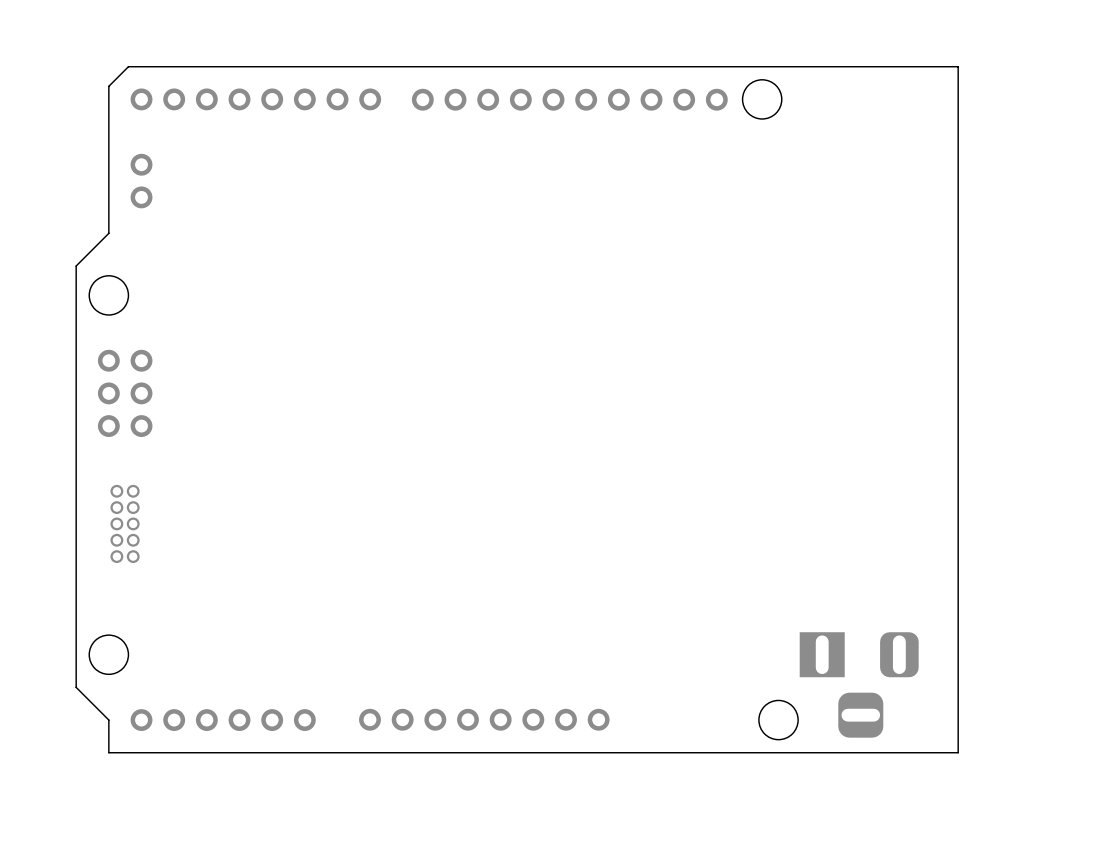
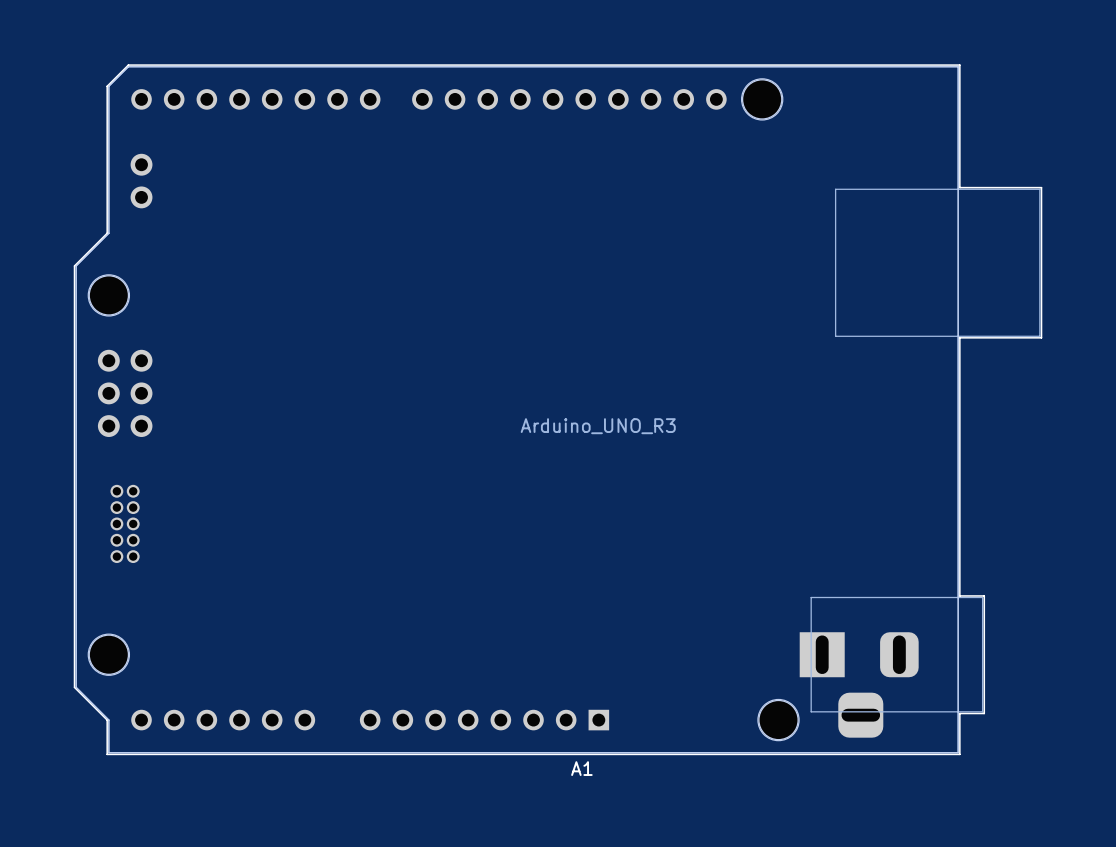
part: (255, 99) -> none
part: (569, 99) -> none
A1: none -> Arduino_UNO_R3 (558, 409)
part: (484, 719) -> none
part: (223, 720) -> none

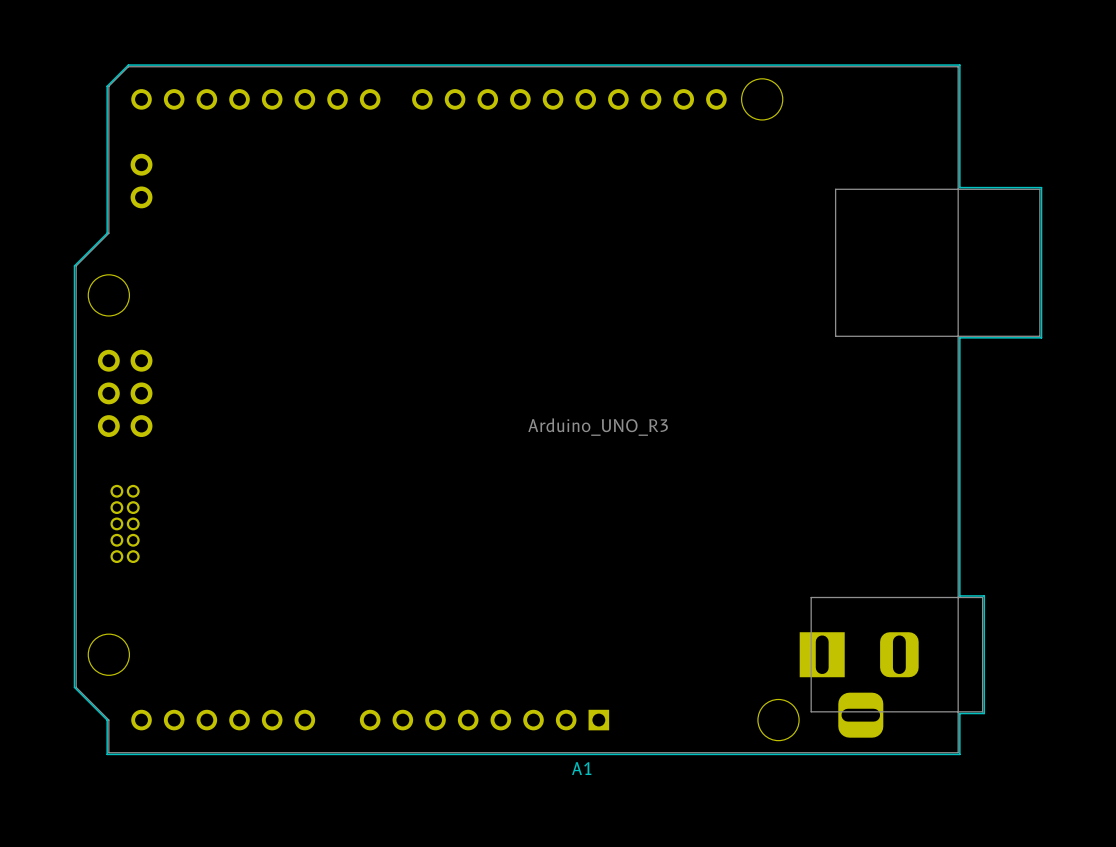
board edge: (958, 66) (128, 66) (108, 86) (108, 233) (76, 266) (76, 687) (108, 720) (108, 752) (958, 752) (958, 66) -> none
round board edge: [741, 79, 783, 120] -> none
round board edge: [88, 275, 130, 316] -> none
round board edge: [88, 634, 130, 675] -> none
round board edge: [758, 699, 799, 741] -> none

